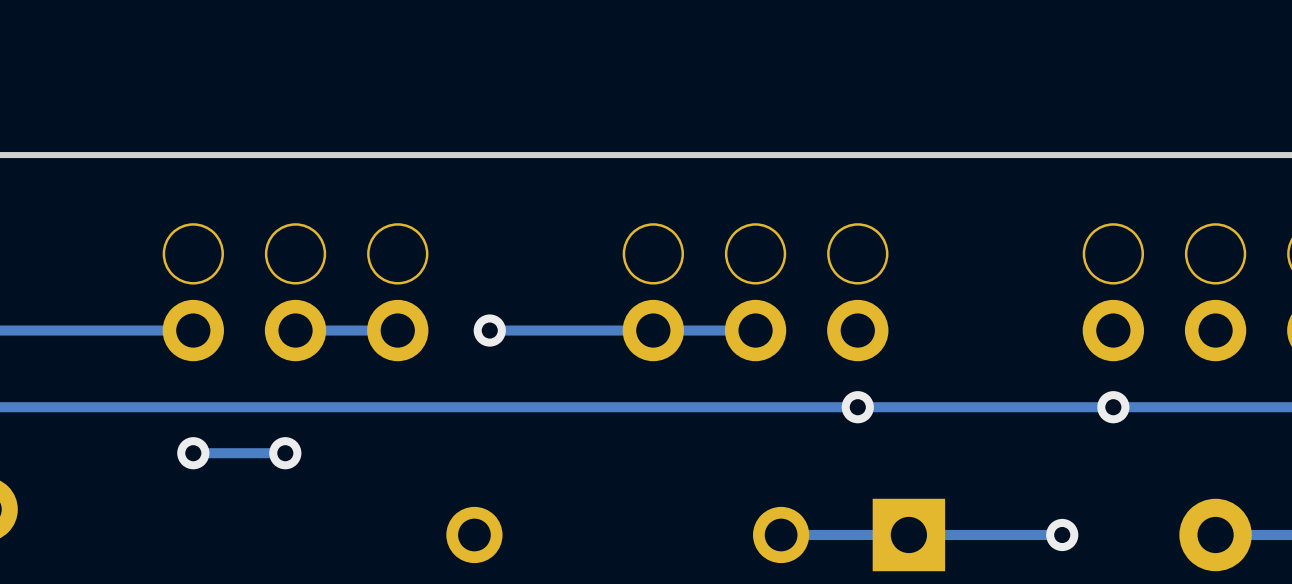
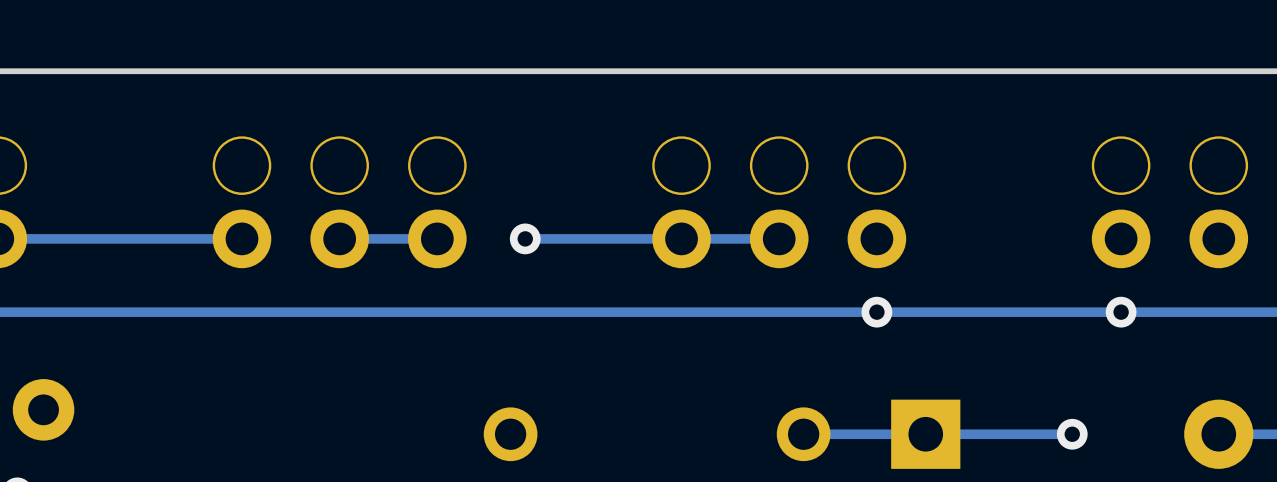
via: (193, 453) -> none
track: (285, 453) (193, 453) -> none
via: (285, 453) -> none

